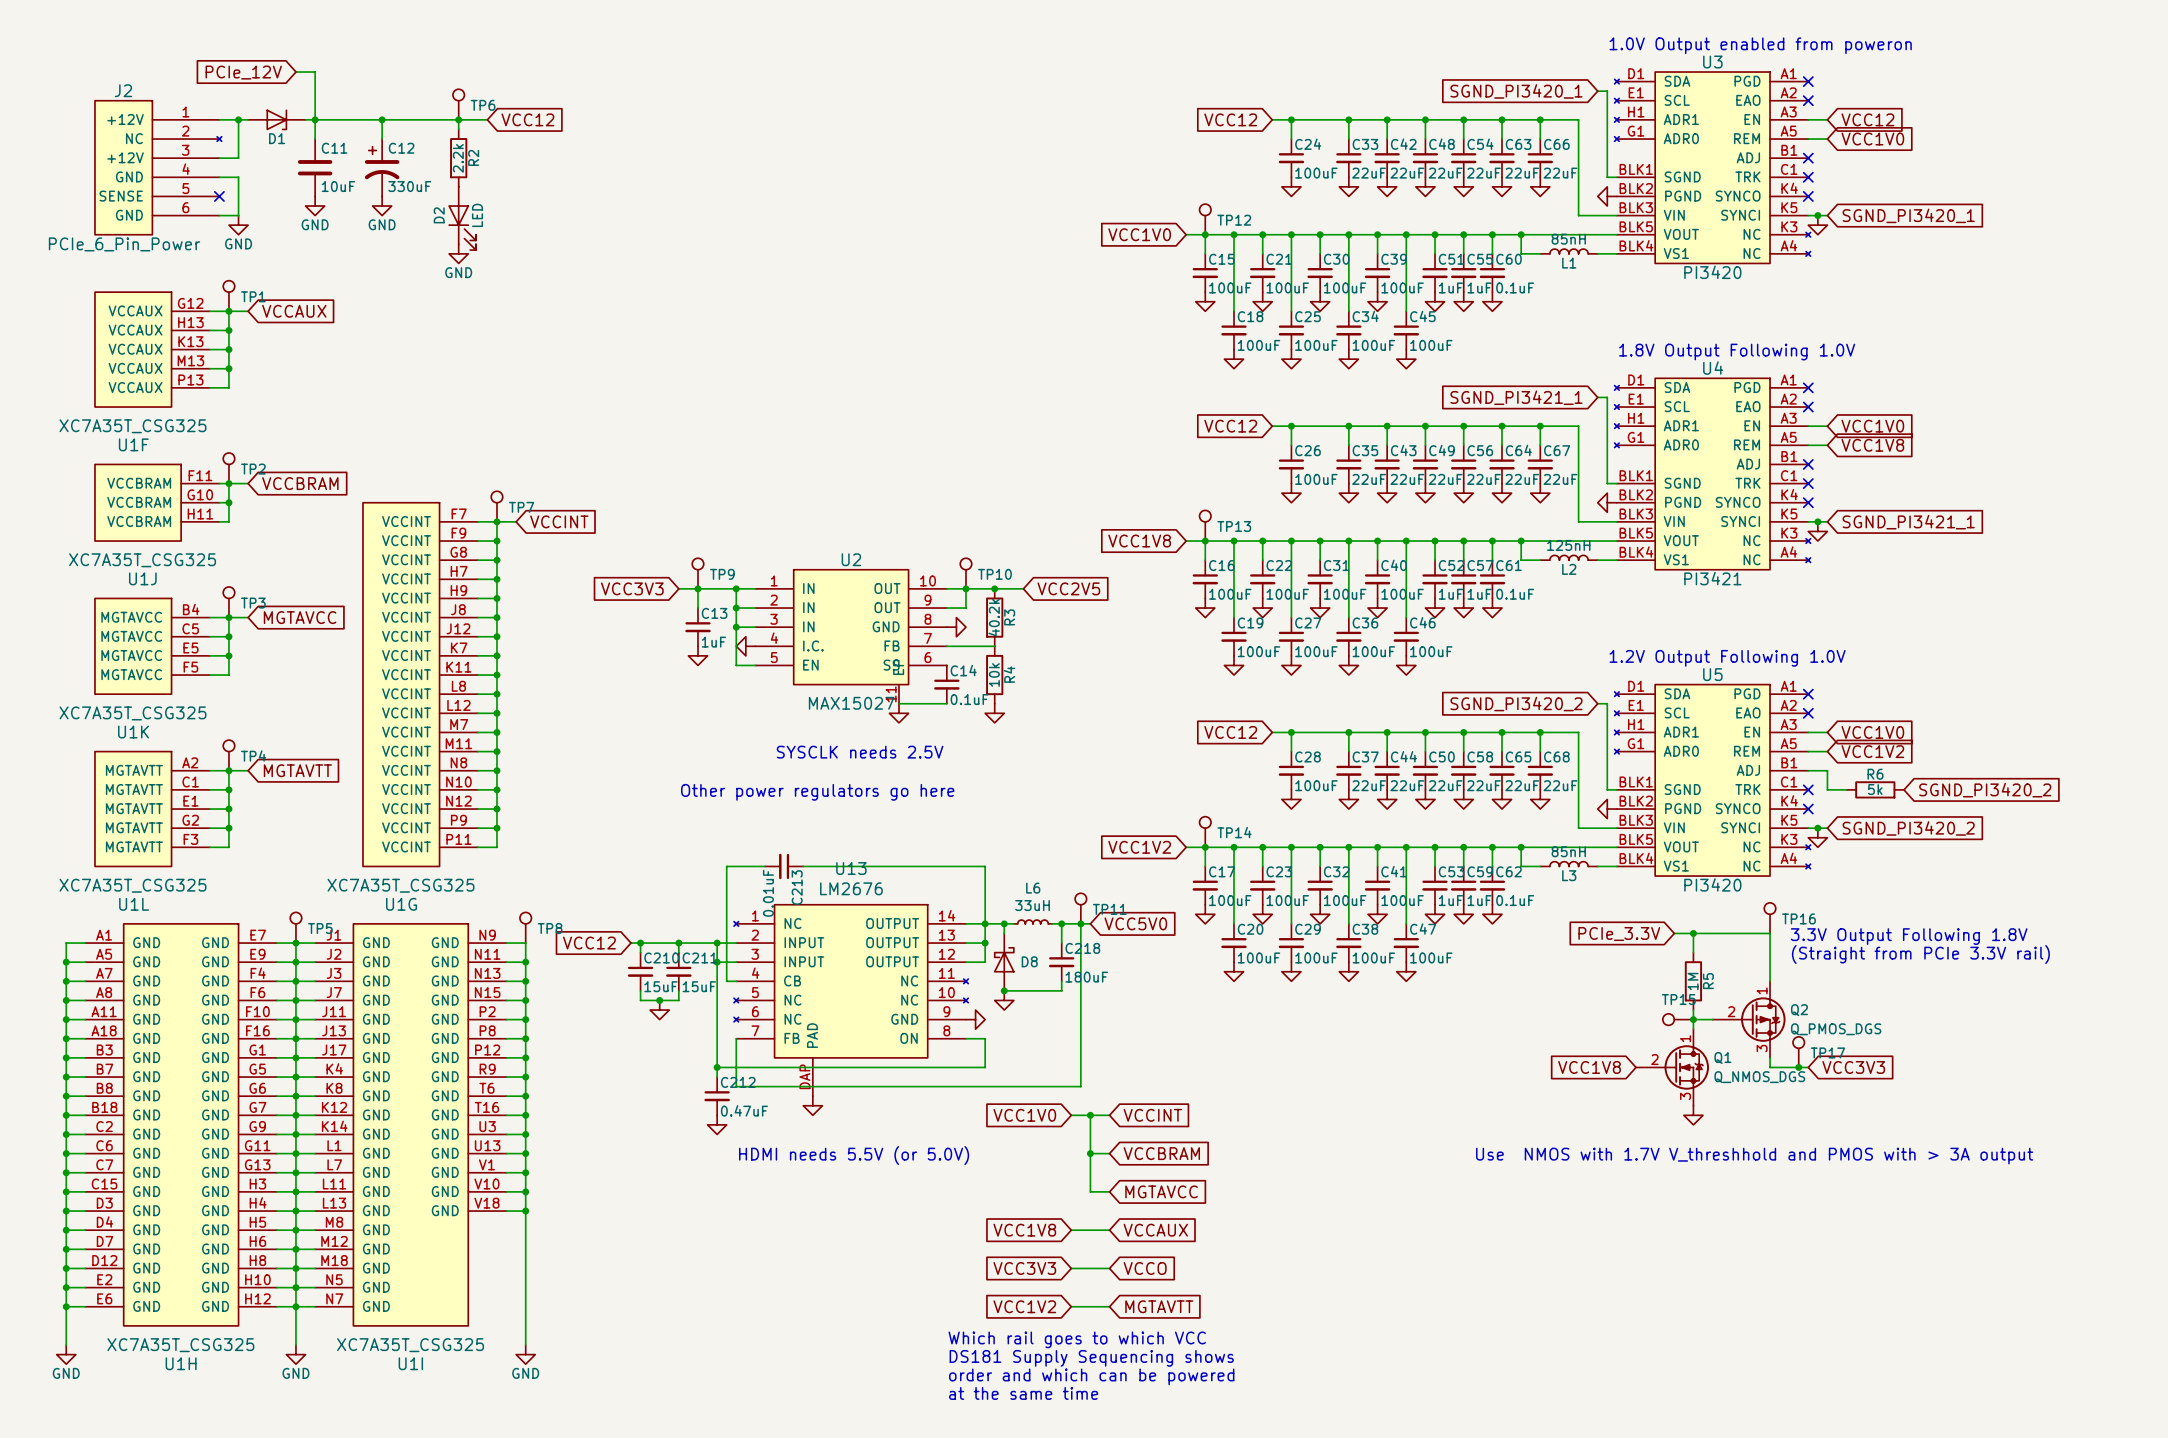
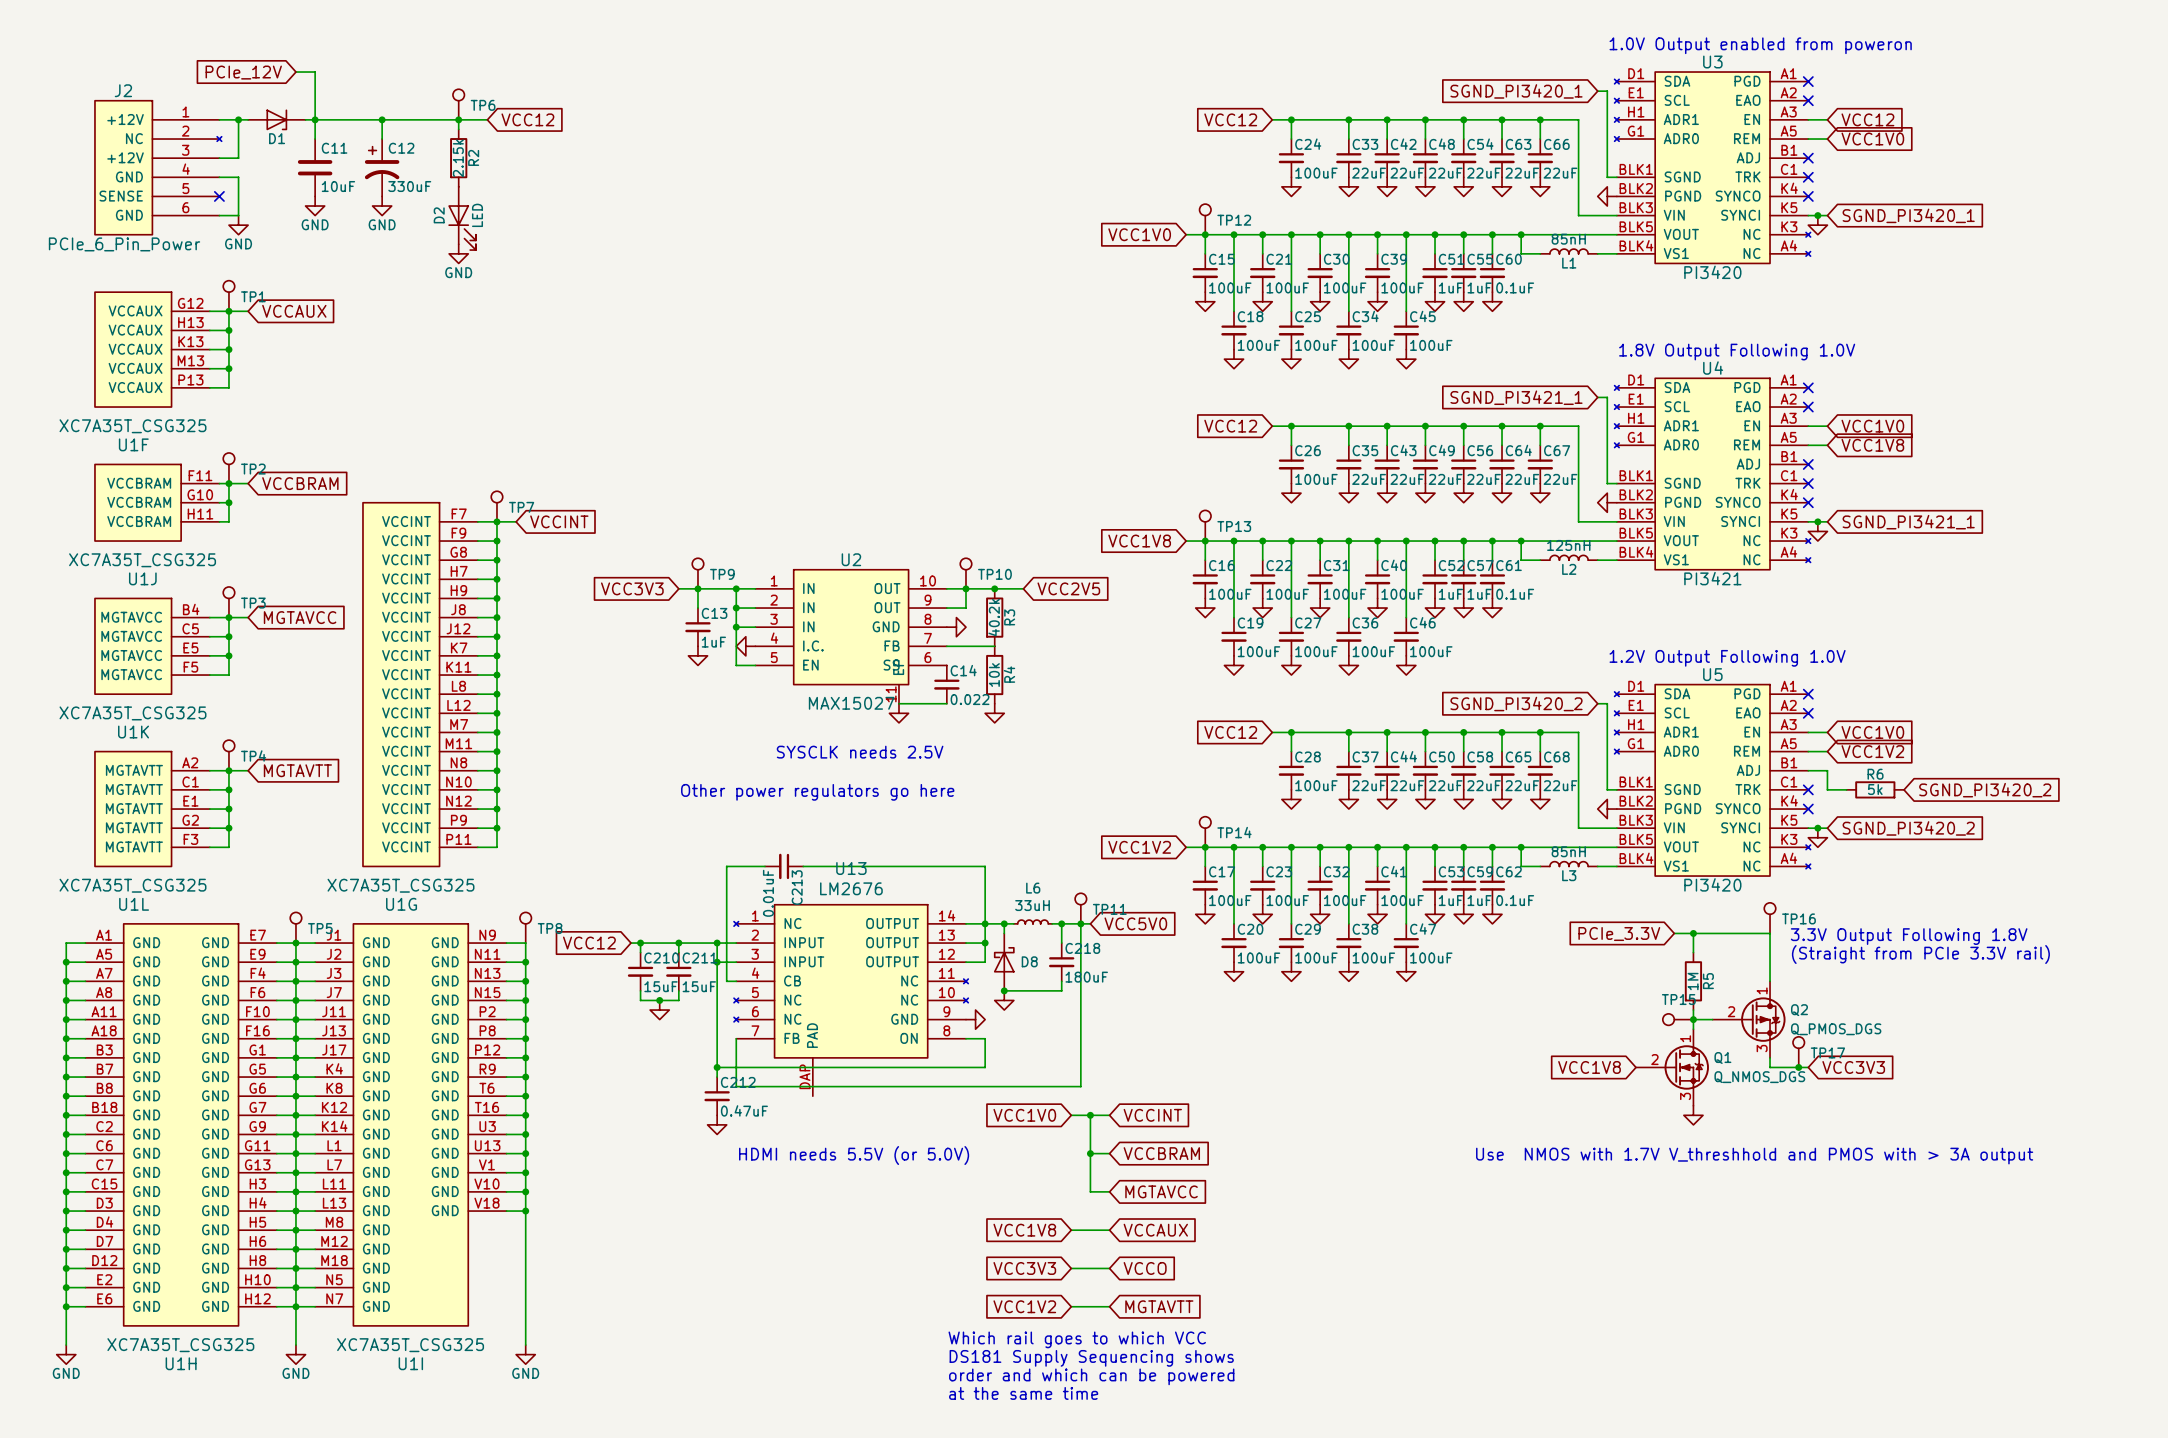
R2 value: 2.2k (458, 158) -> 2.15k (458, 158)
C14 value: 0.1uF (969, 699) -> 0.022 (970, 699)
power symbol: (812, 1105) -> none

